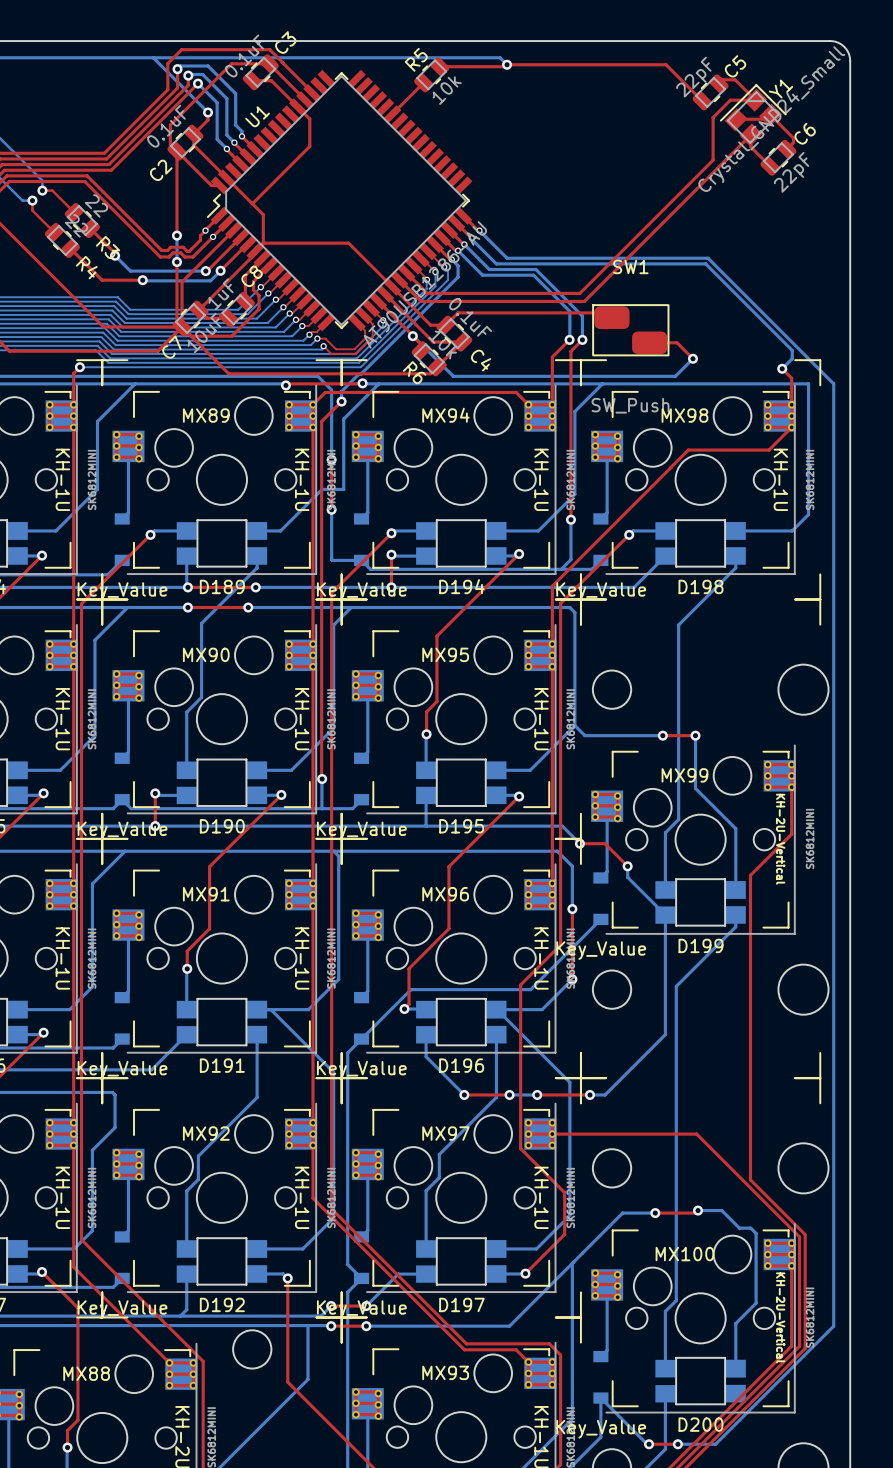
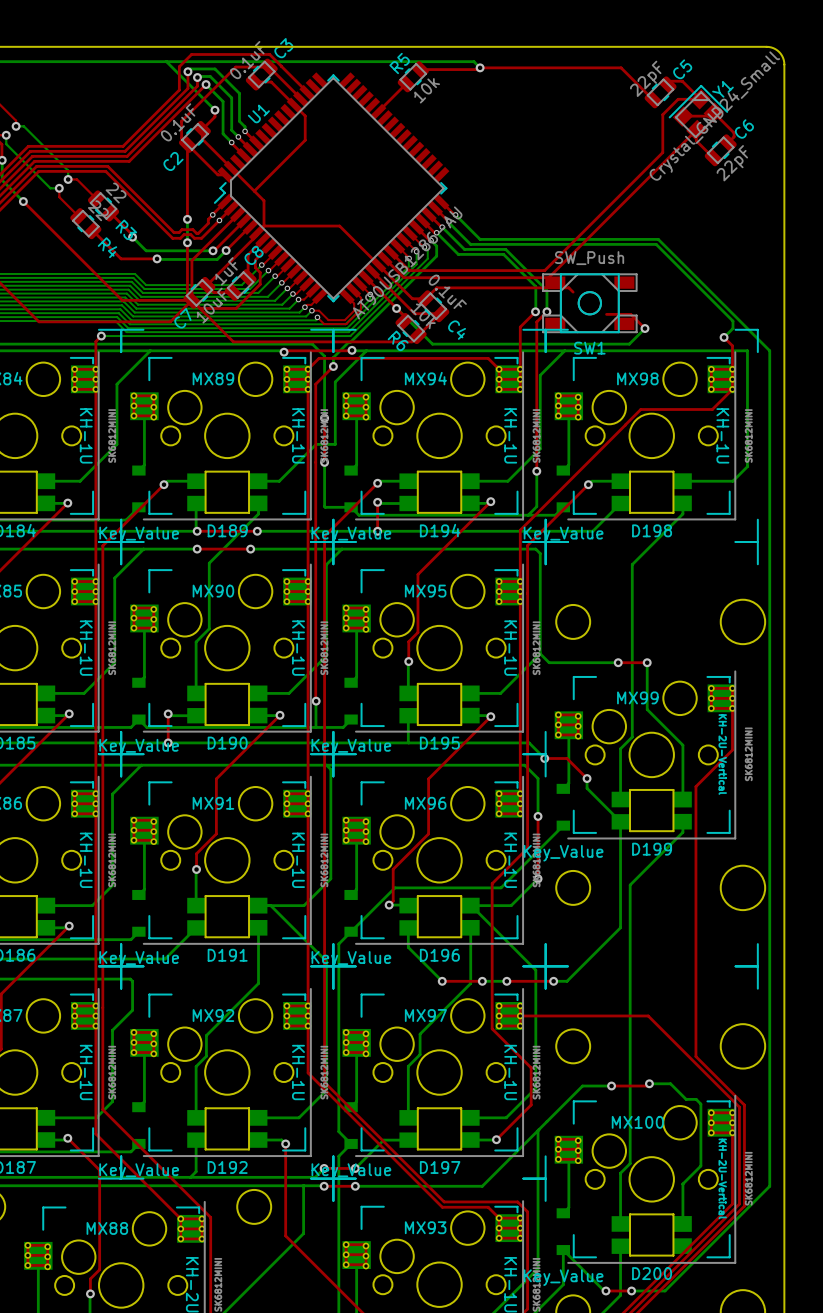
SW1 name position: SW1 (630, 266) -> SW1 (589, 348)
SW1 footprint: [592, 304, 670, 357] -> [542, 273, 638, 334]
SW1 value position: SW_Push (630, 405) -> SW_Push (589, 258)

